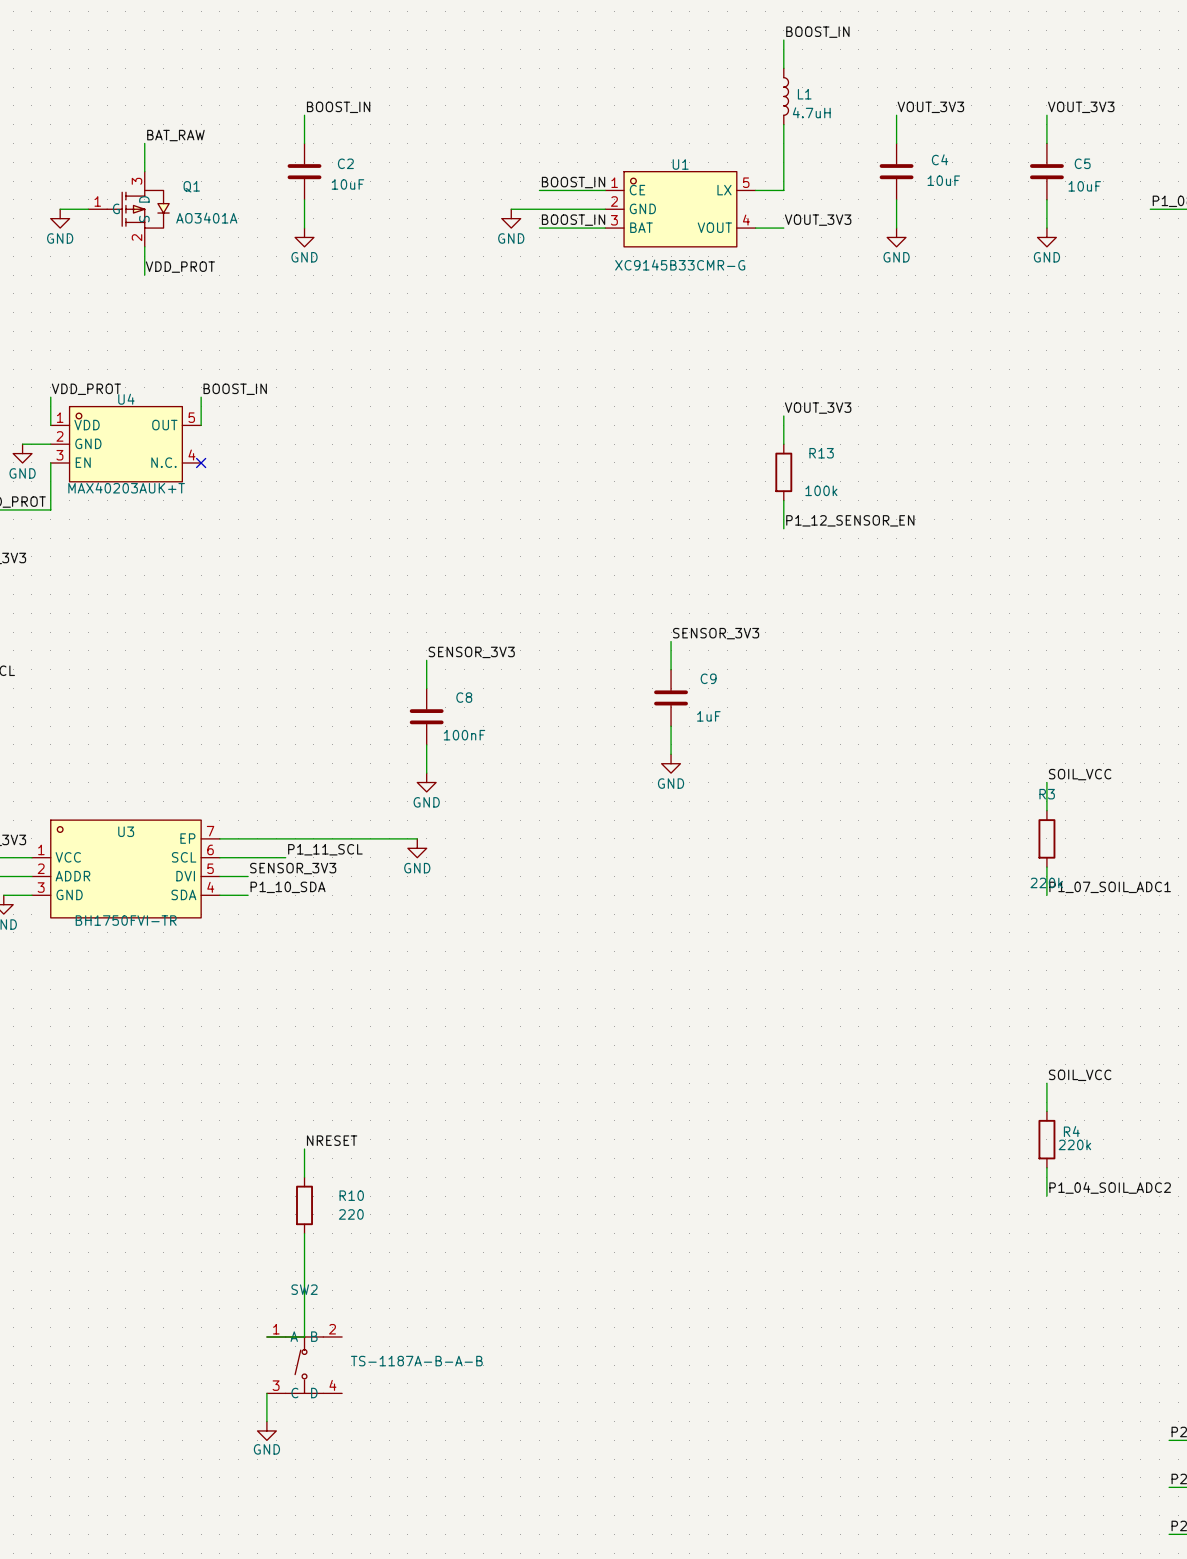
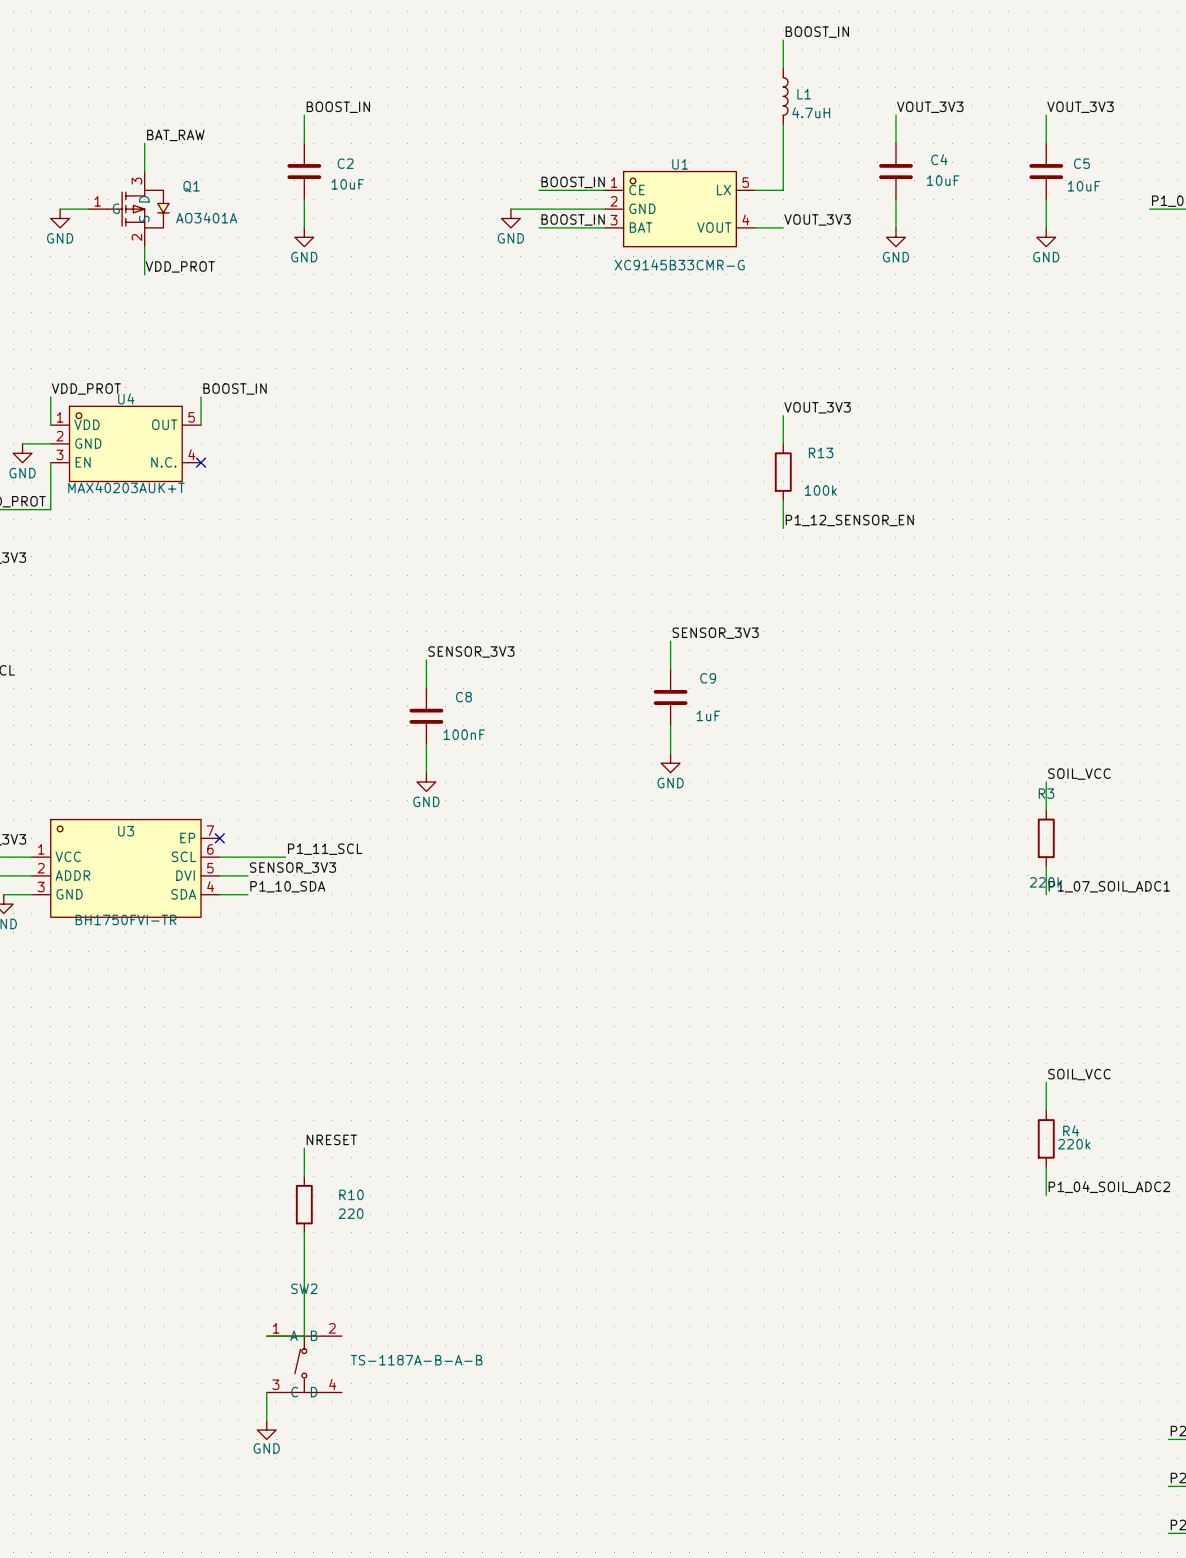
wire: (219, 838) (417, 838) -> none
no-connect mark: none -> (219, 838)
power symbol: GND (417, 848) -> none

